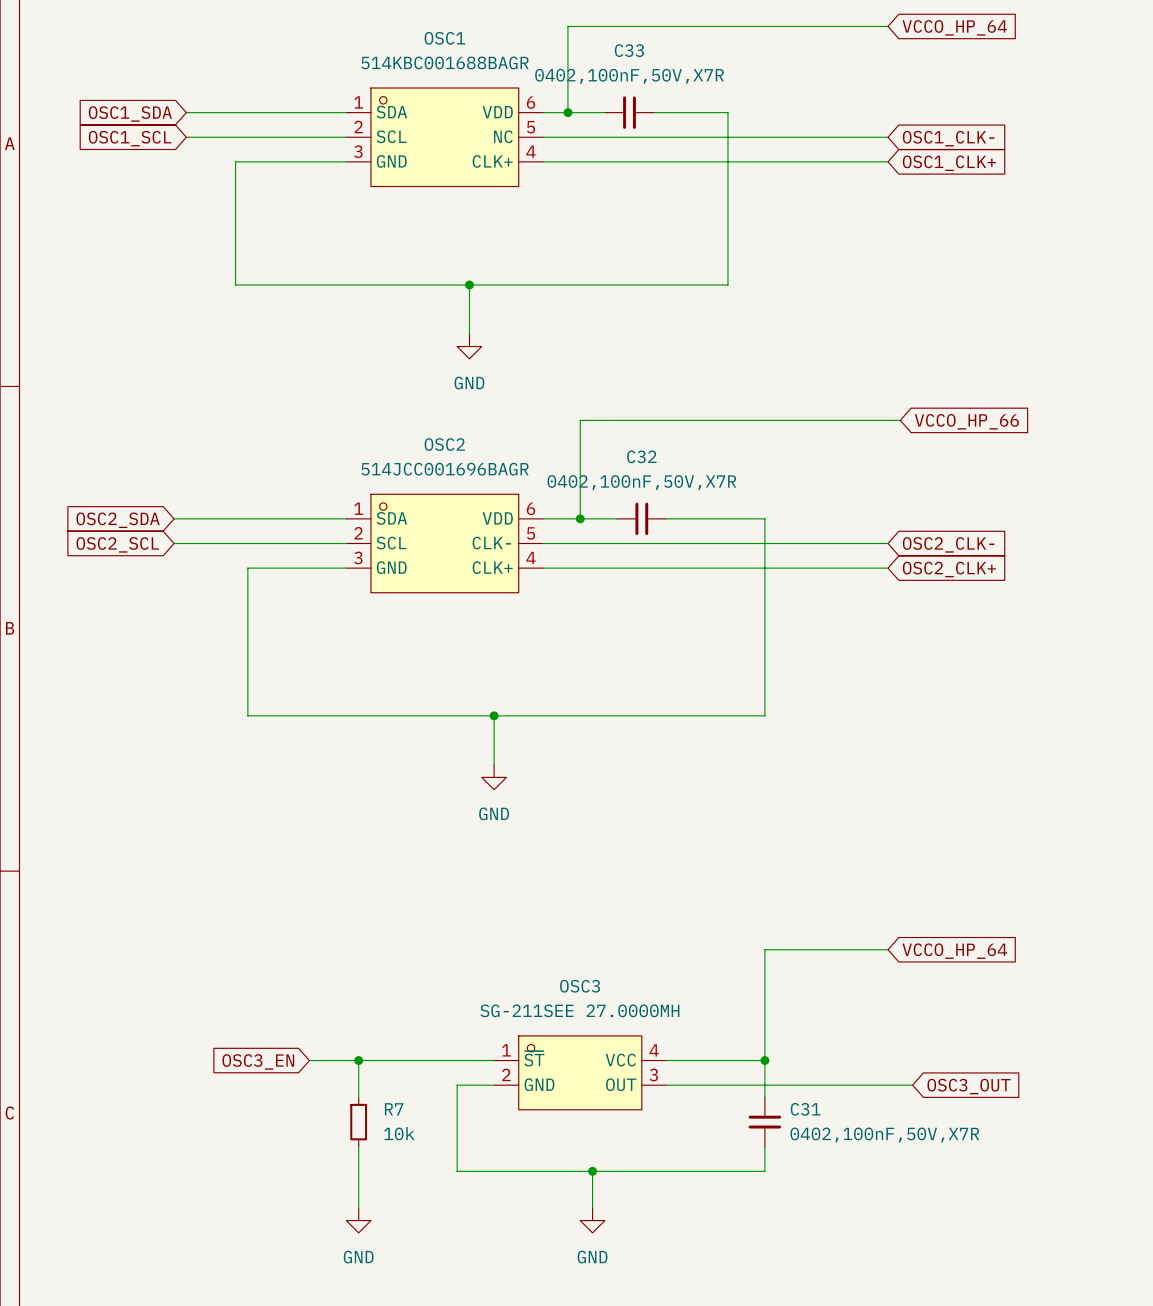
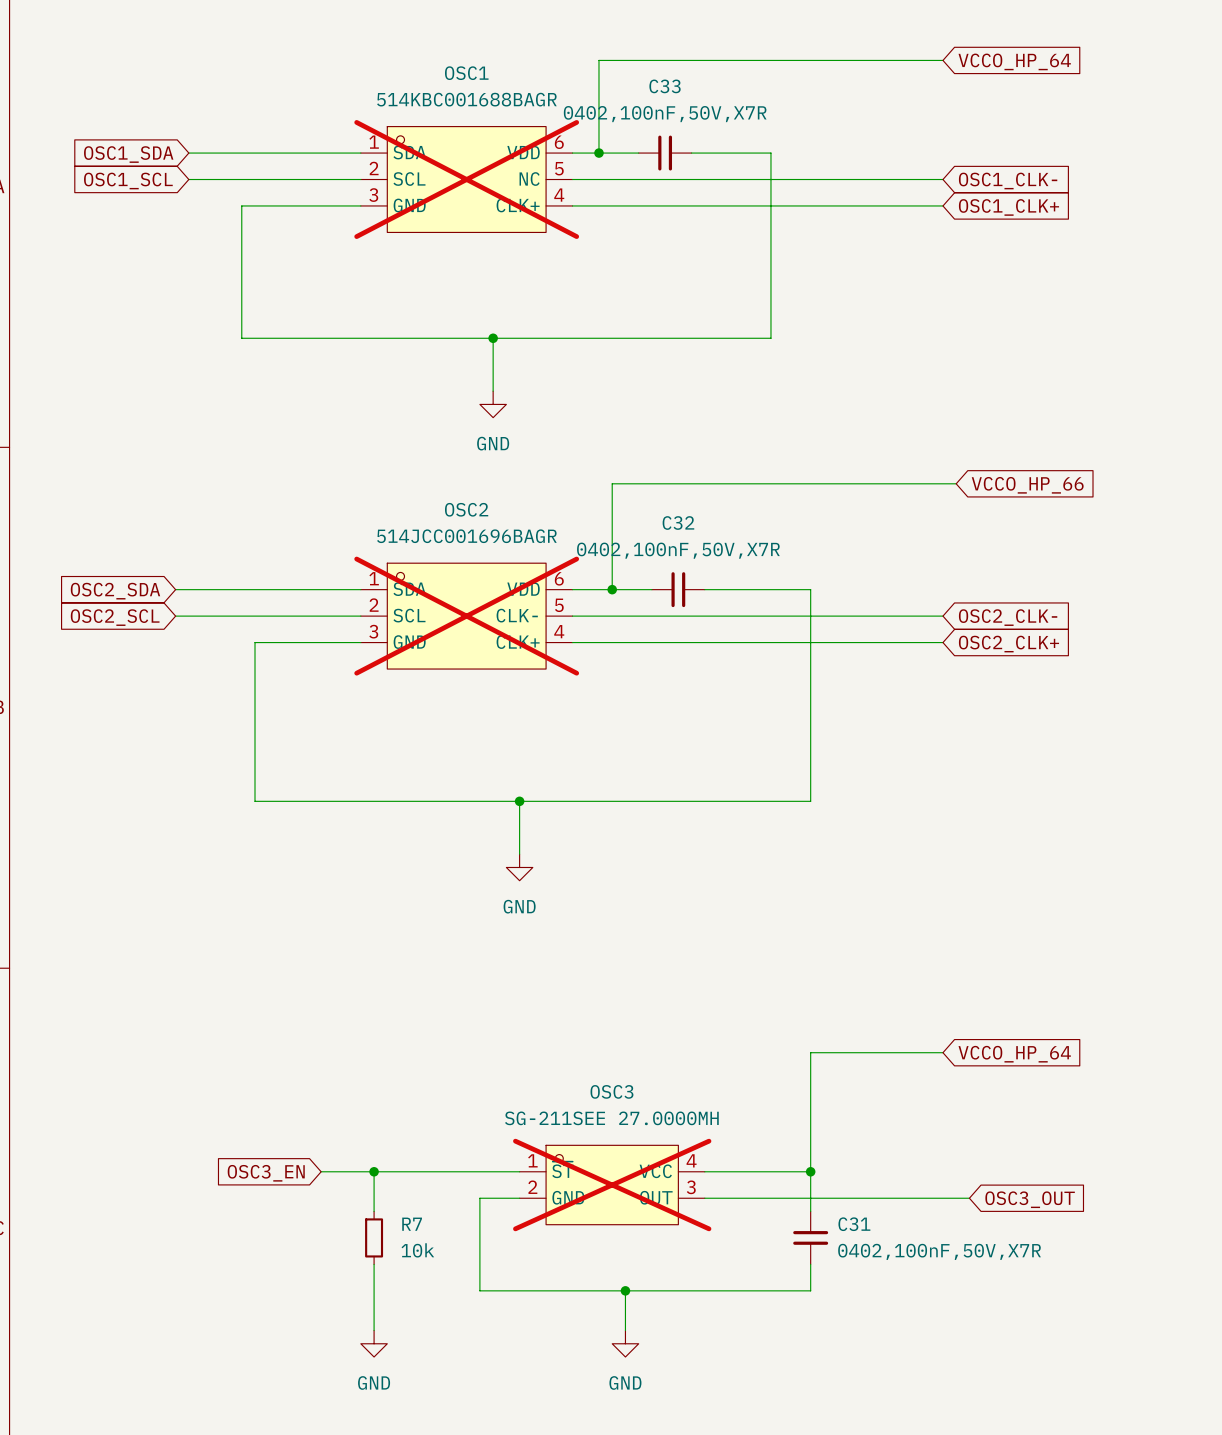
OSC1 do-not-place cross: none -> (466, 179)
OSC2 do-not-place cross: none -> (466, 616)
OSC3 do-not-place cross: none -> (612, 1185)

